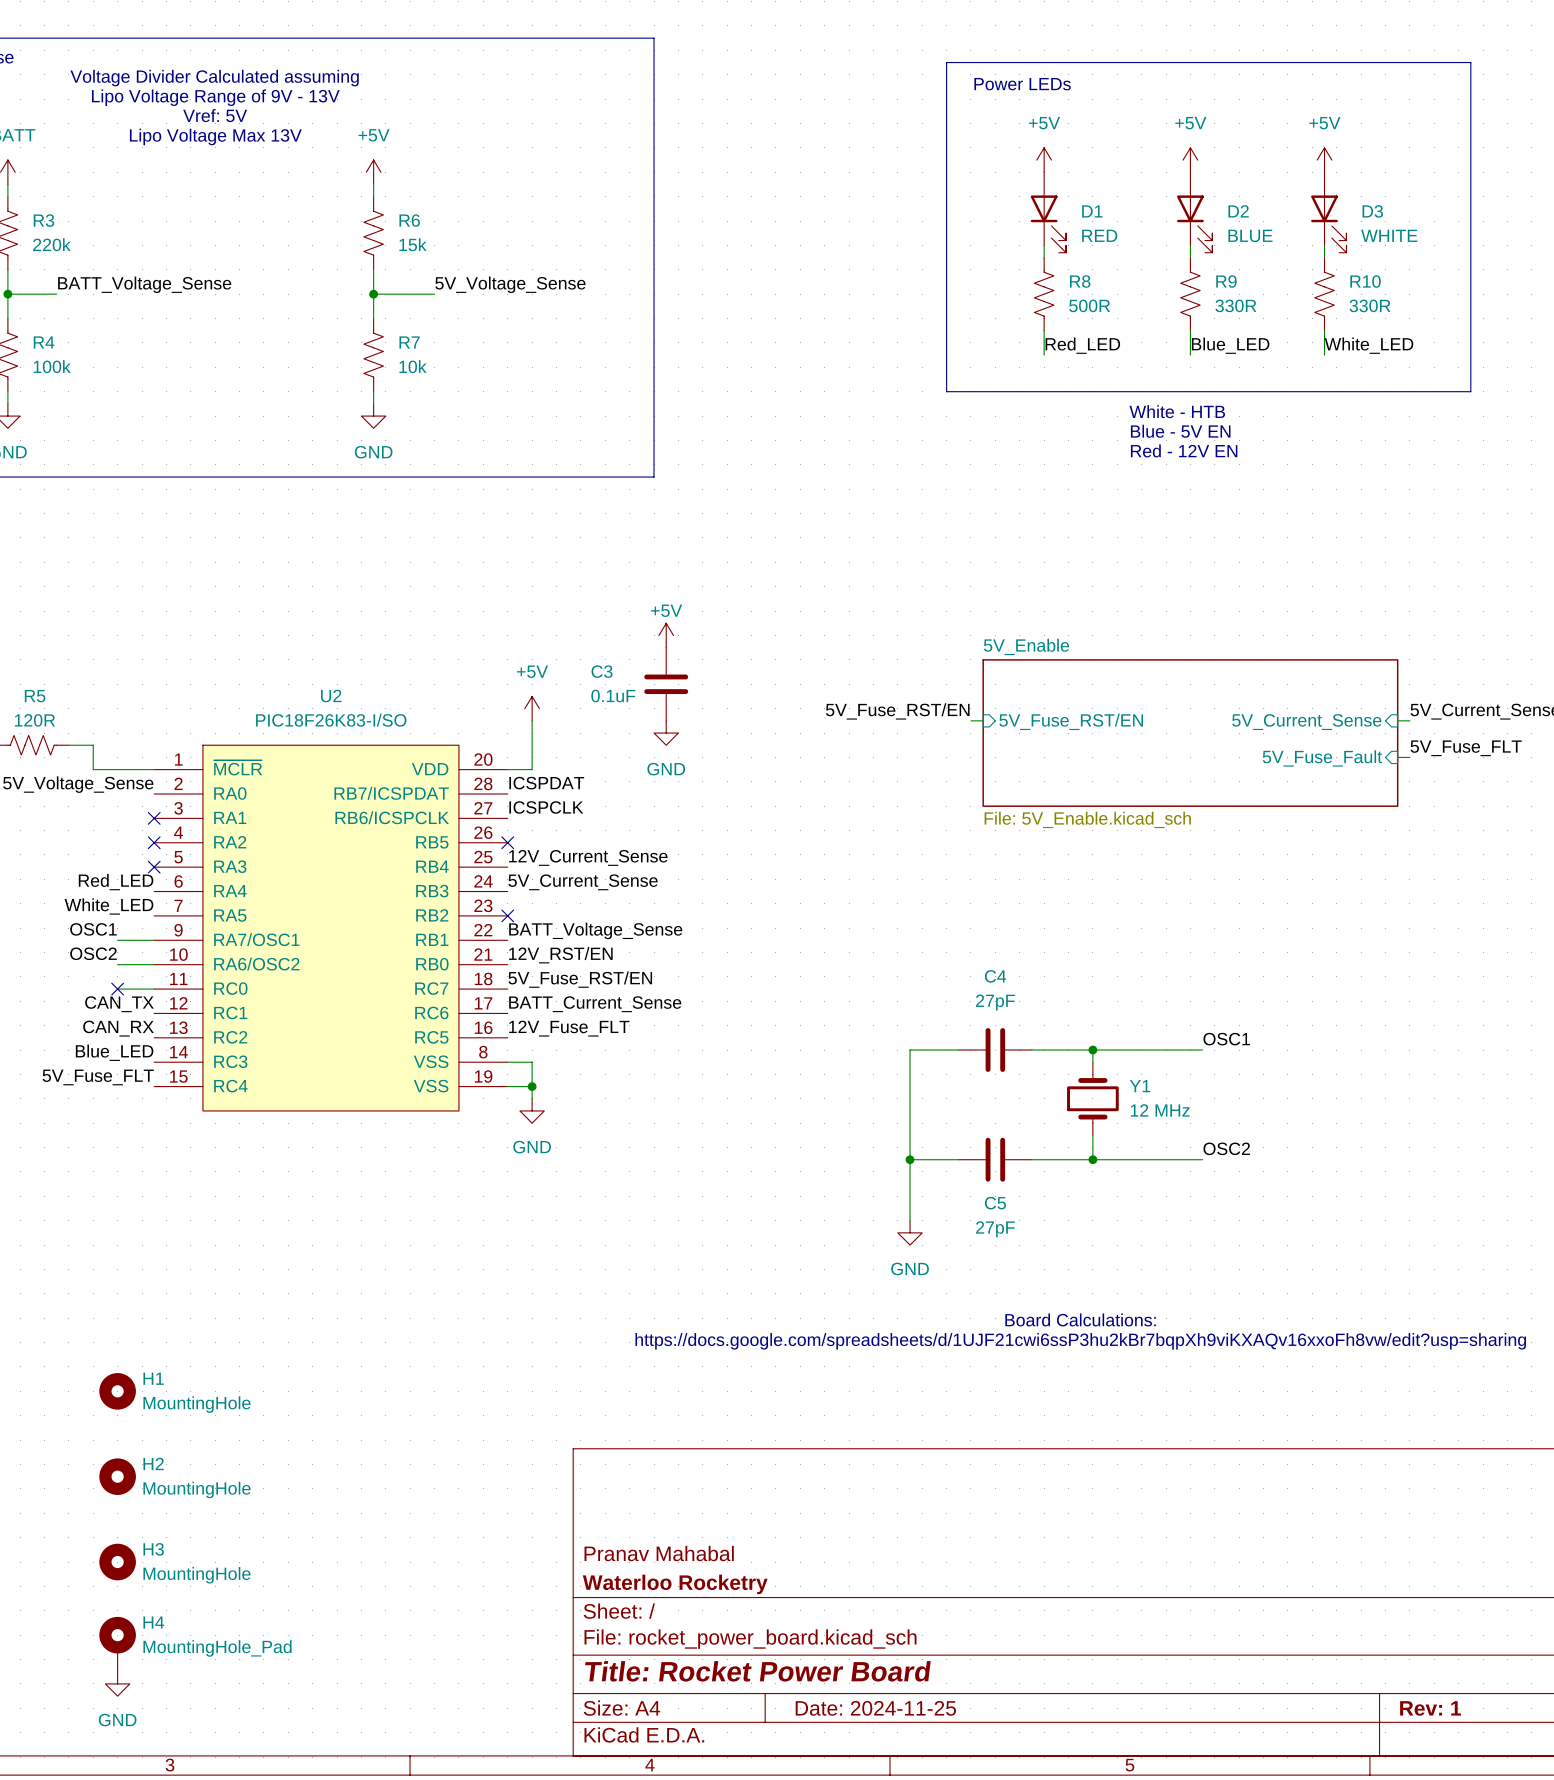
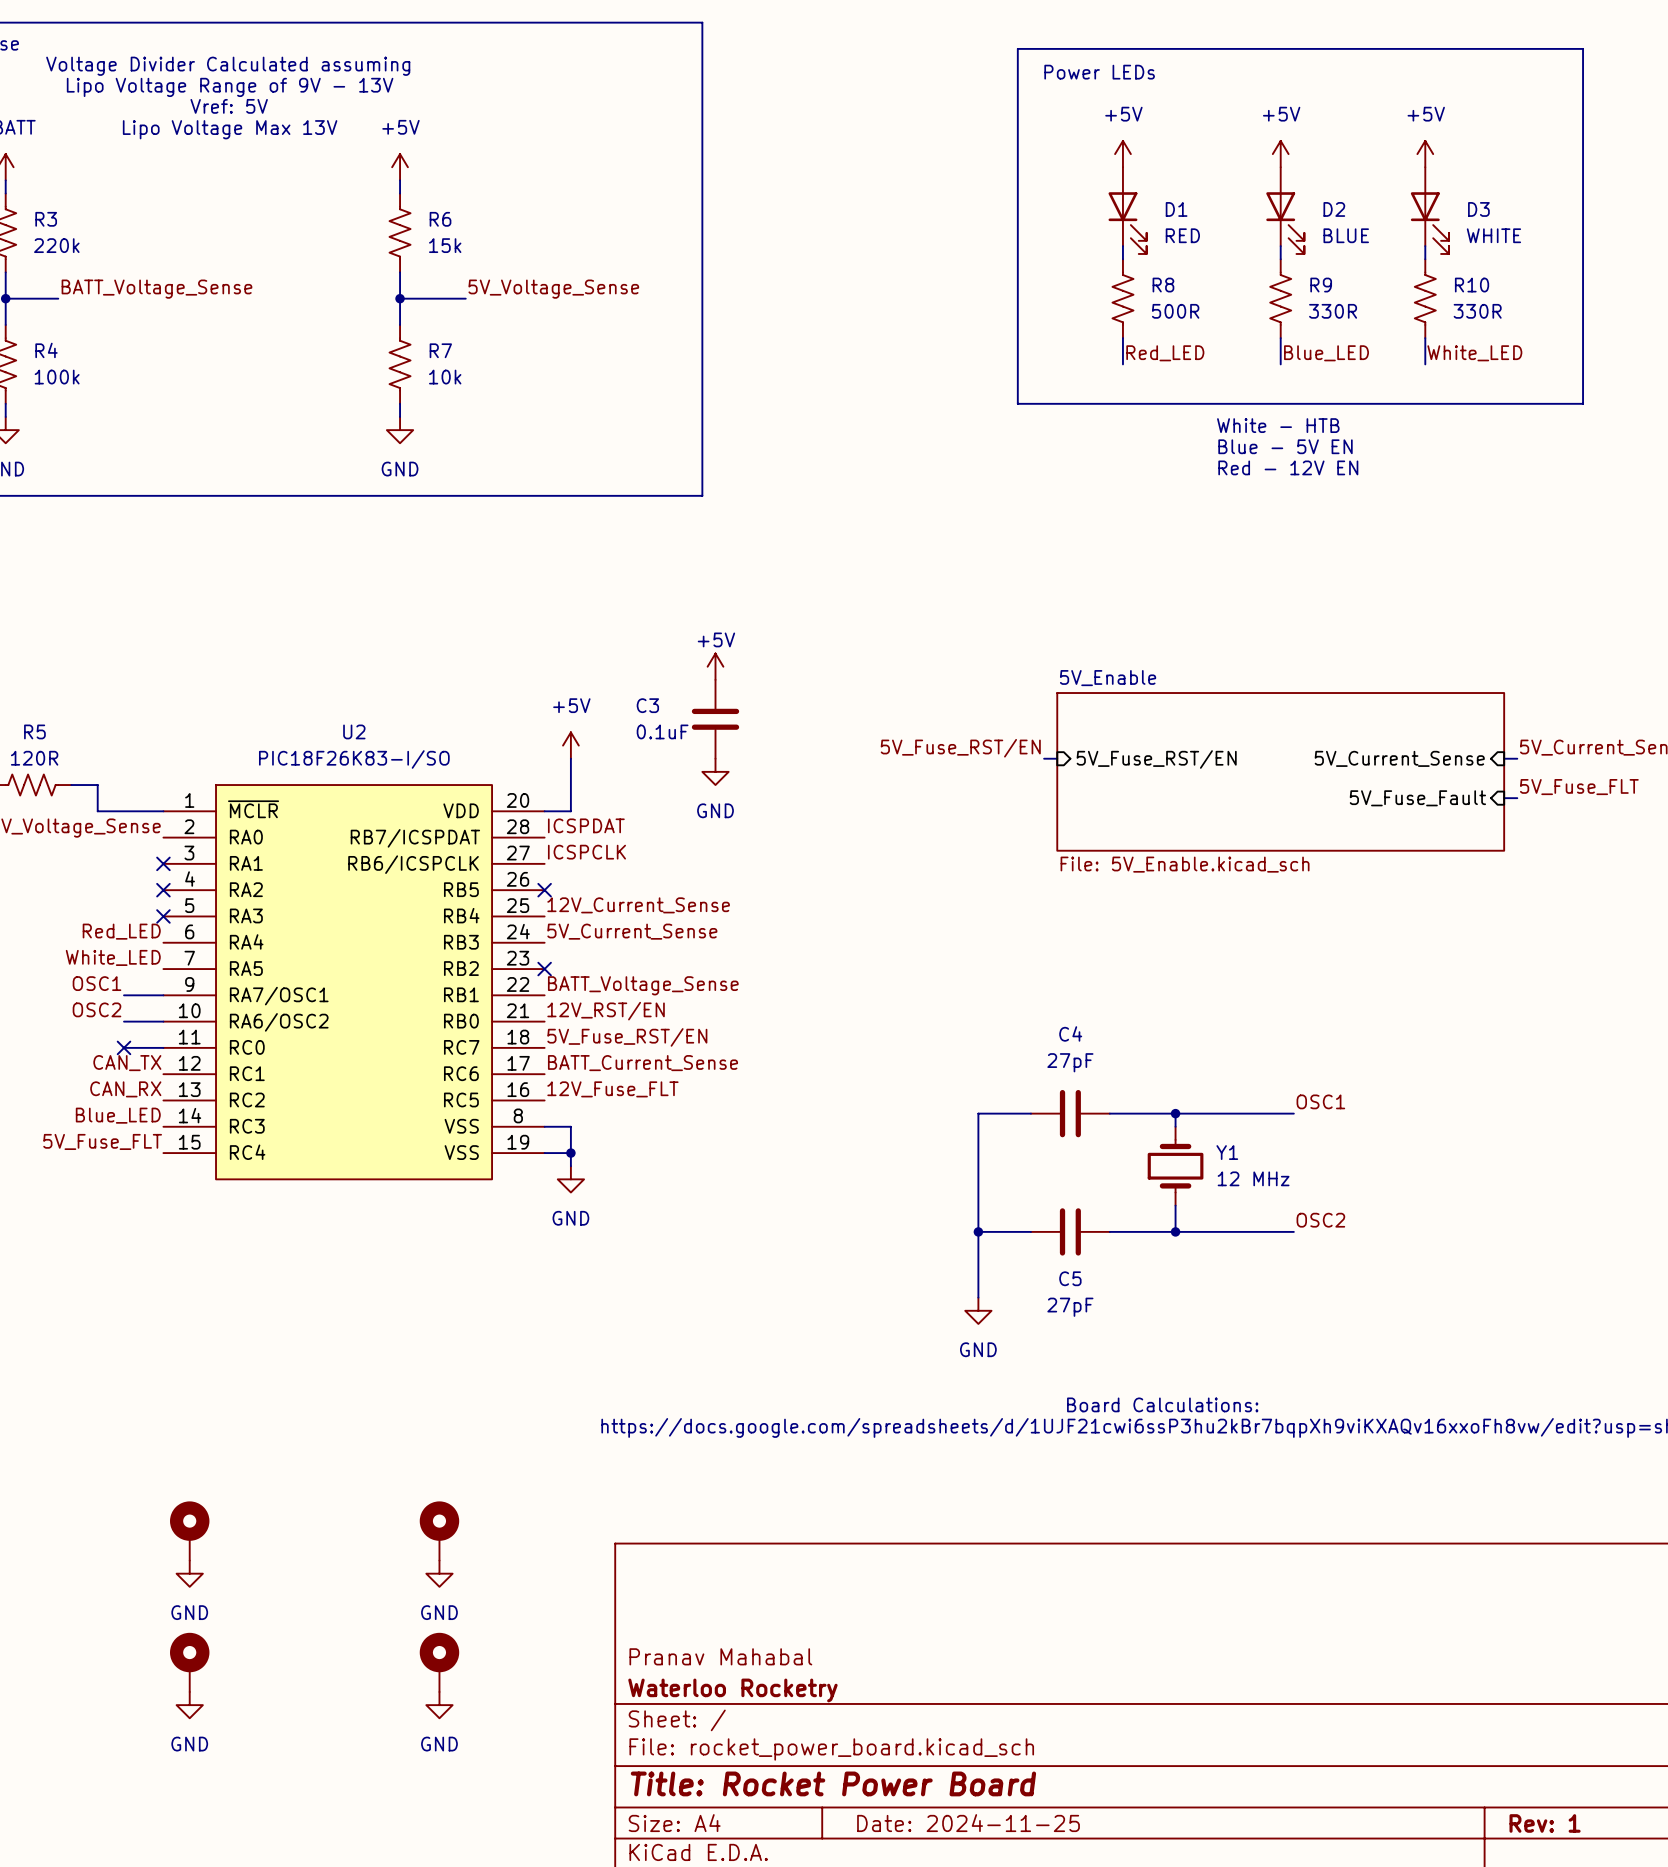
H1: MountingHole (117, 1391) -> none
part: none -> (189, 1530)
part: none -> (439, 1530)
H2: MountingHole (117, 1476) -> none
power symbol: none -> GND (189, 1573)
power symbol: none -> GND (439, 1573)
part: none -> (189, 1662)
part: none -> (439, 1662)
H3: MountingHole (117, 1562) -> none
power symbol: none -> GND (439, 1705)
H4: MountingHole_Pad (117, 1644) -> none
power symbol position: GND (117, 1683) -> GND (189, 1705)

